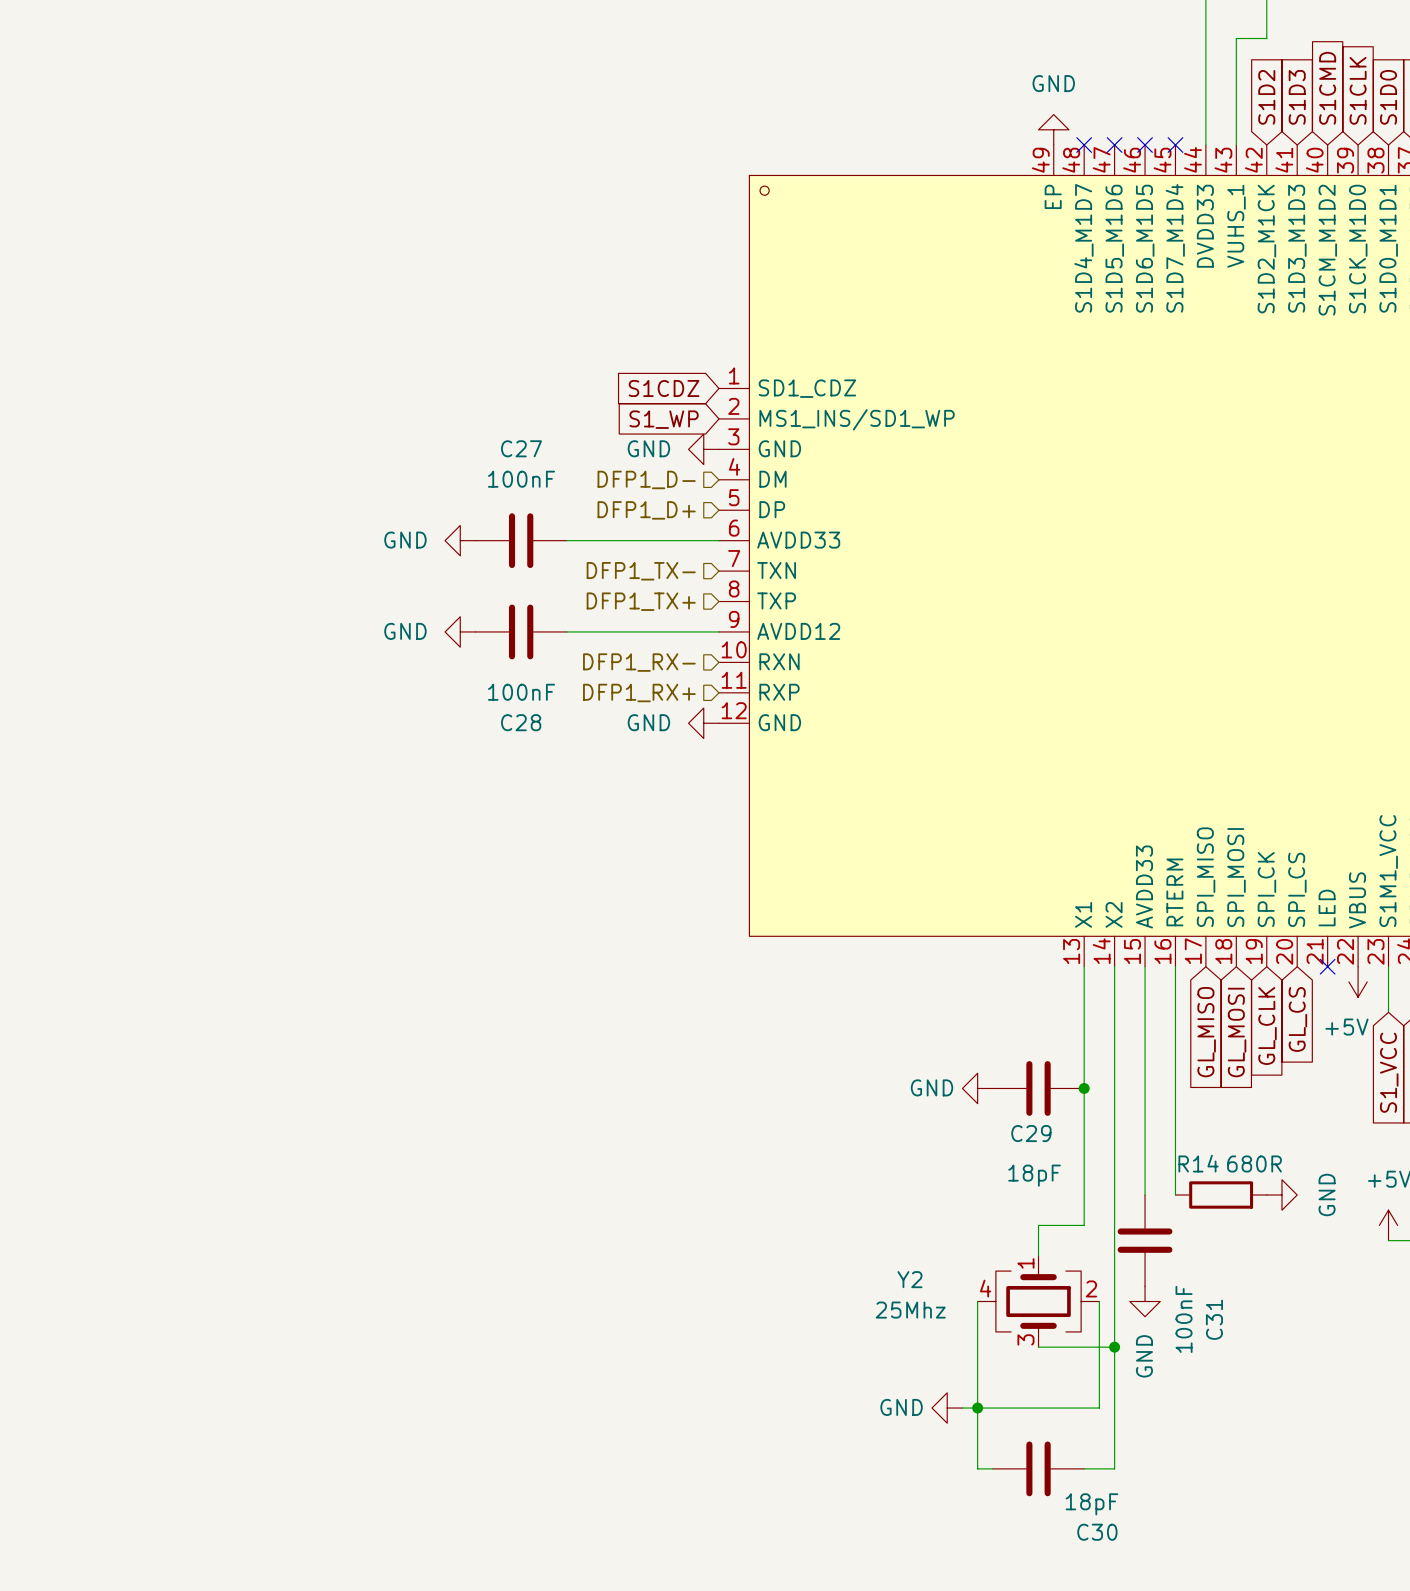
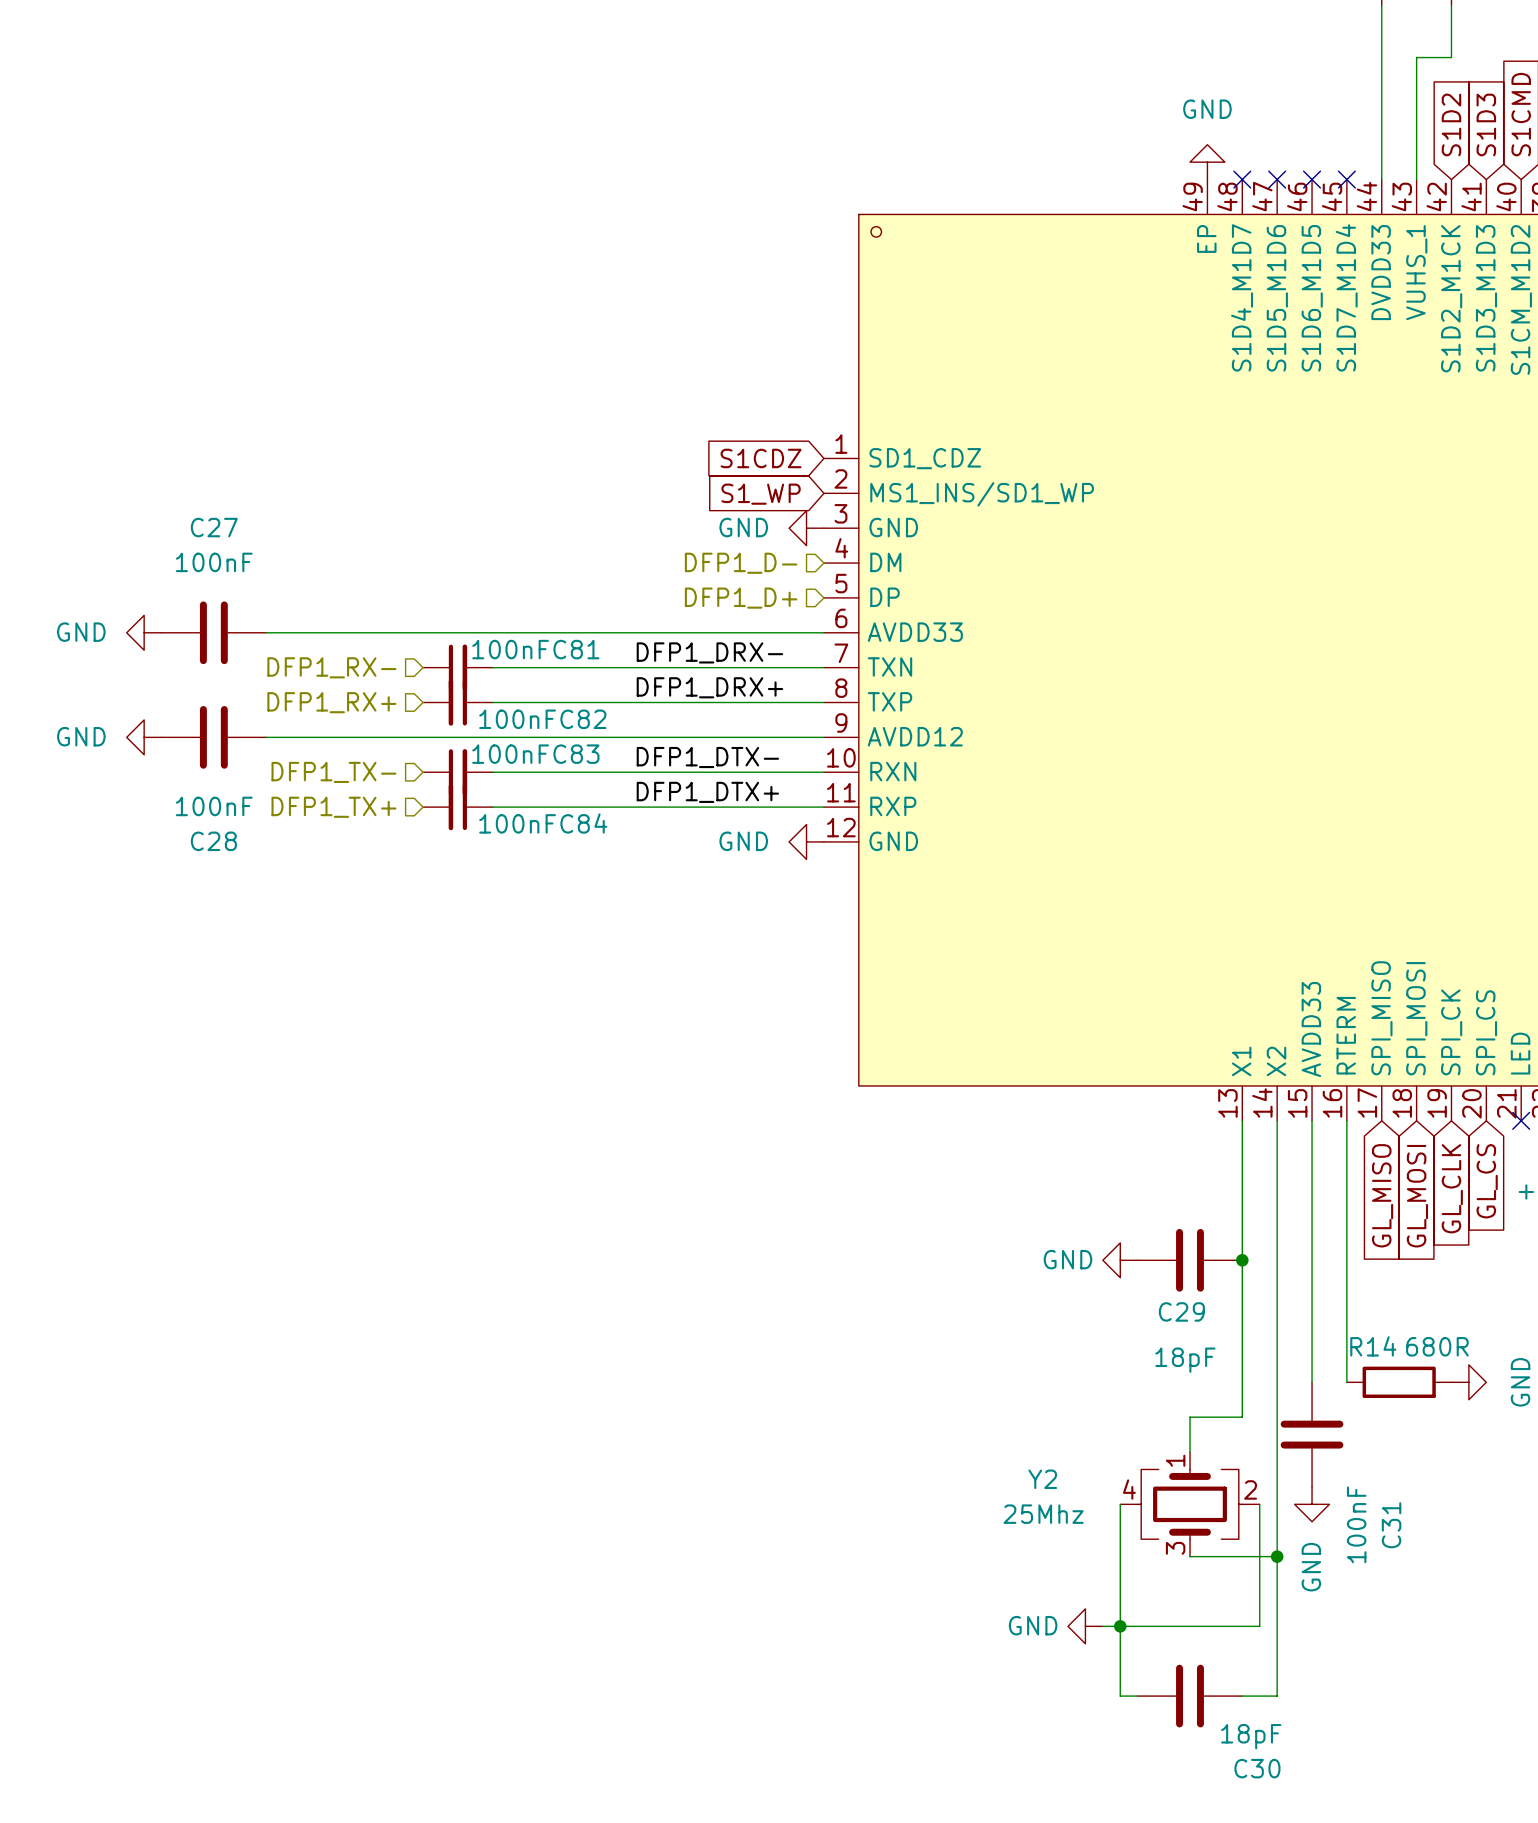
power symbol: none -> GND (144, 632)
wire: none -> (266, 632) (649, 632)
power symbol: GND (460, 540) -> none
C27 position: (521, 540) -> (213, 632)
label: none -> DFP1_DRX- (709, 652)
hierarchical label: none -> DFP1_RX- (331, 667)
C81: none -> 100nF (457, 667)
wire: none -> (492, 667) (823, 667)
hierarchical label: DFP1_TX- (641, 571) -> none
label: none -> DFP1_DRX+ (709, 687)
hierarchical label: none -> DFP1_RX+ (331, 702)
C82: none -> 100nF (457, 702)
wire: none -> (492, 702) (823, 702)
hierarchical label: DFP1_TX+ (641, 601) -> none
power symbol: none -> GND (144, 737)
wire: none -> (266, 737) (649, 737)
power symbol: GND (460, 631) -> none
C28 position: (521, 631) -> (213, 737)
label: none -> DFP1_DTX- (707, 757)
hierarchical label: none -> DFP1_TX- (333, 772)
C83: none -> 100nF (457, 772)
wire: none -> (492, 772) (823, 772)
hierarchical label: DFP1_RX- (639, 662) -> none
label: none -> DFP1_DTX+ (707, 792)
hierarchical label: none -> DFP1_TX+ (333, 807)
C84: none -> 100nF (457, 807)
wire: none -> (492, 807) (823, 807)
hierarchical label: DFP1_RX+ (639, 692) -> none

